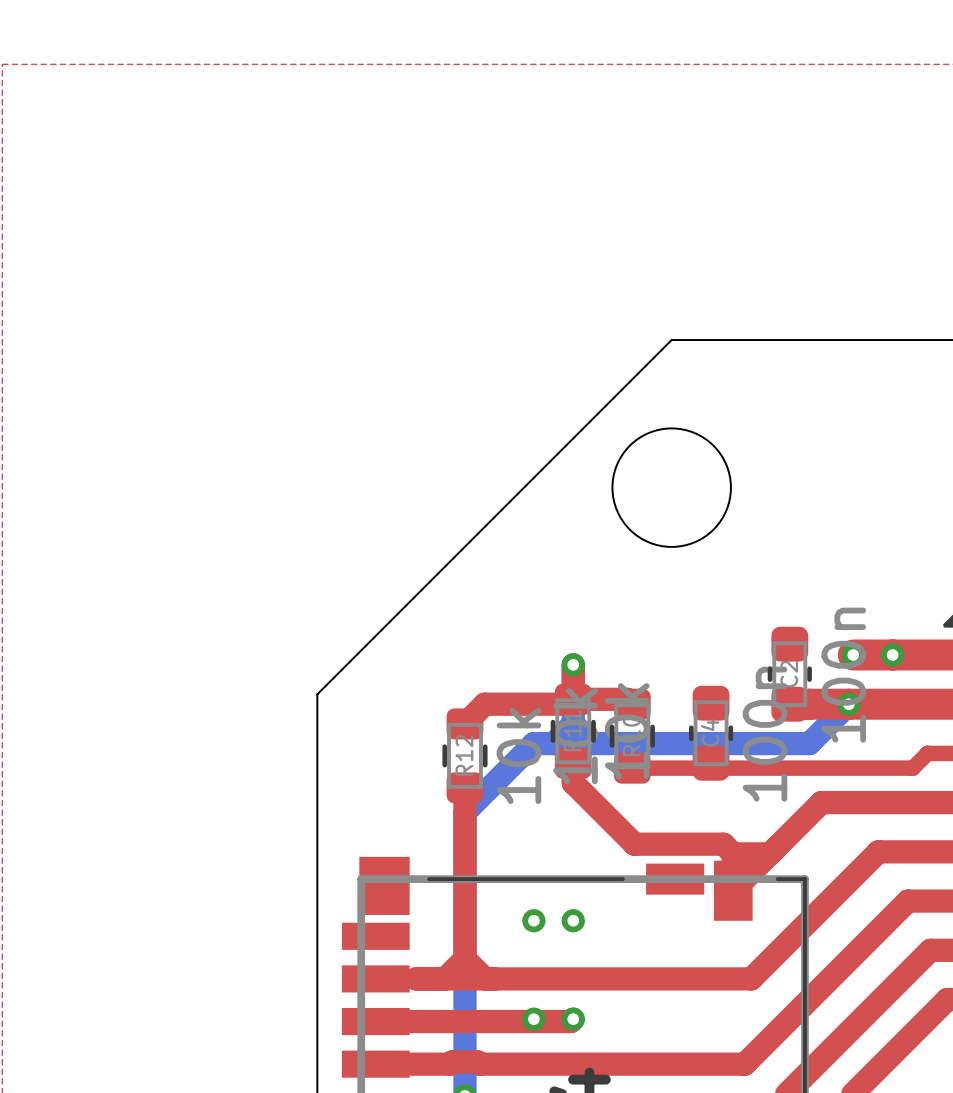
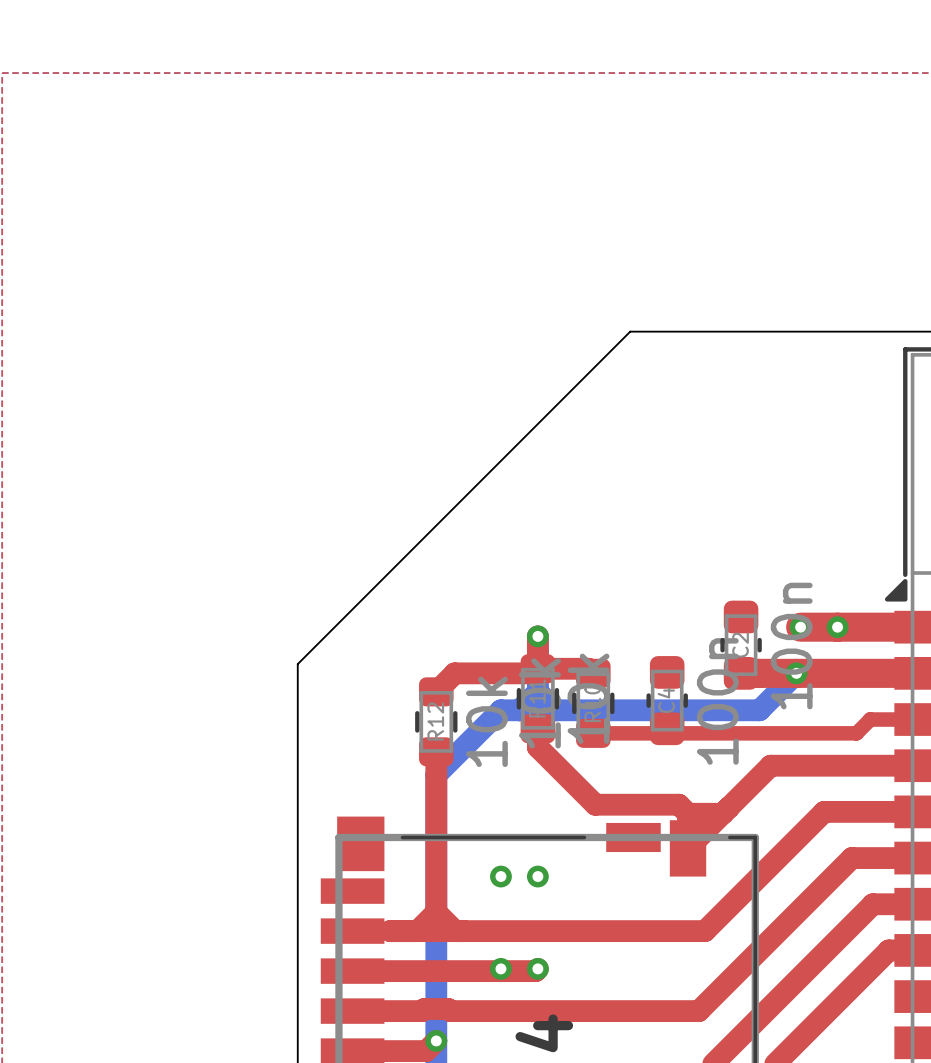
round board edge: [611, 427, 732, 548] -> none

